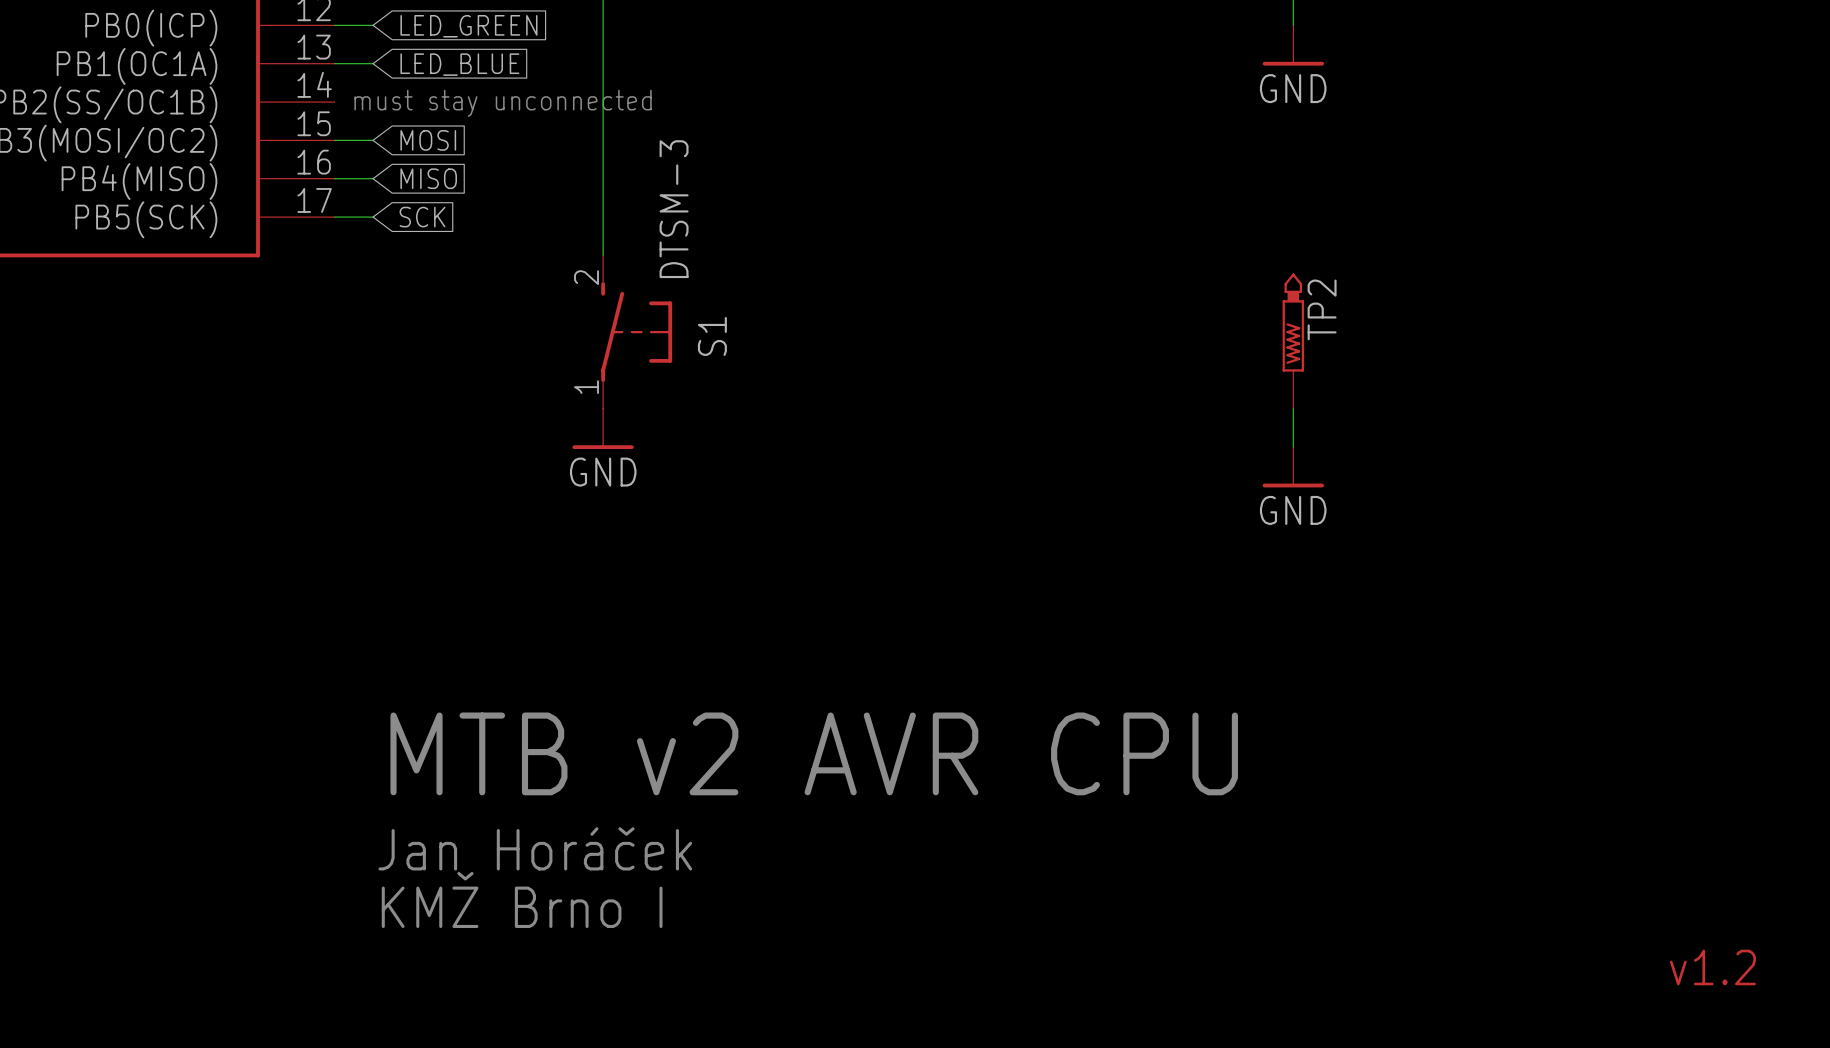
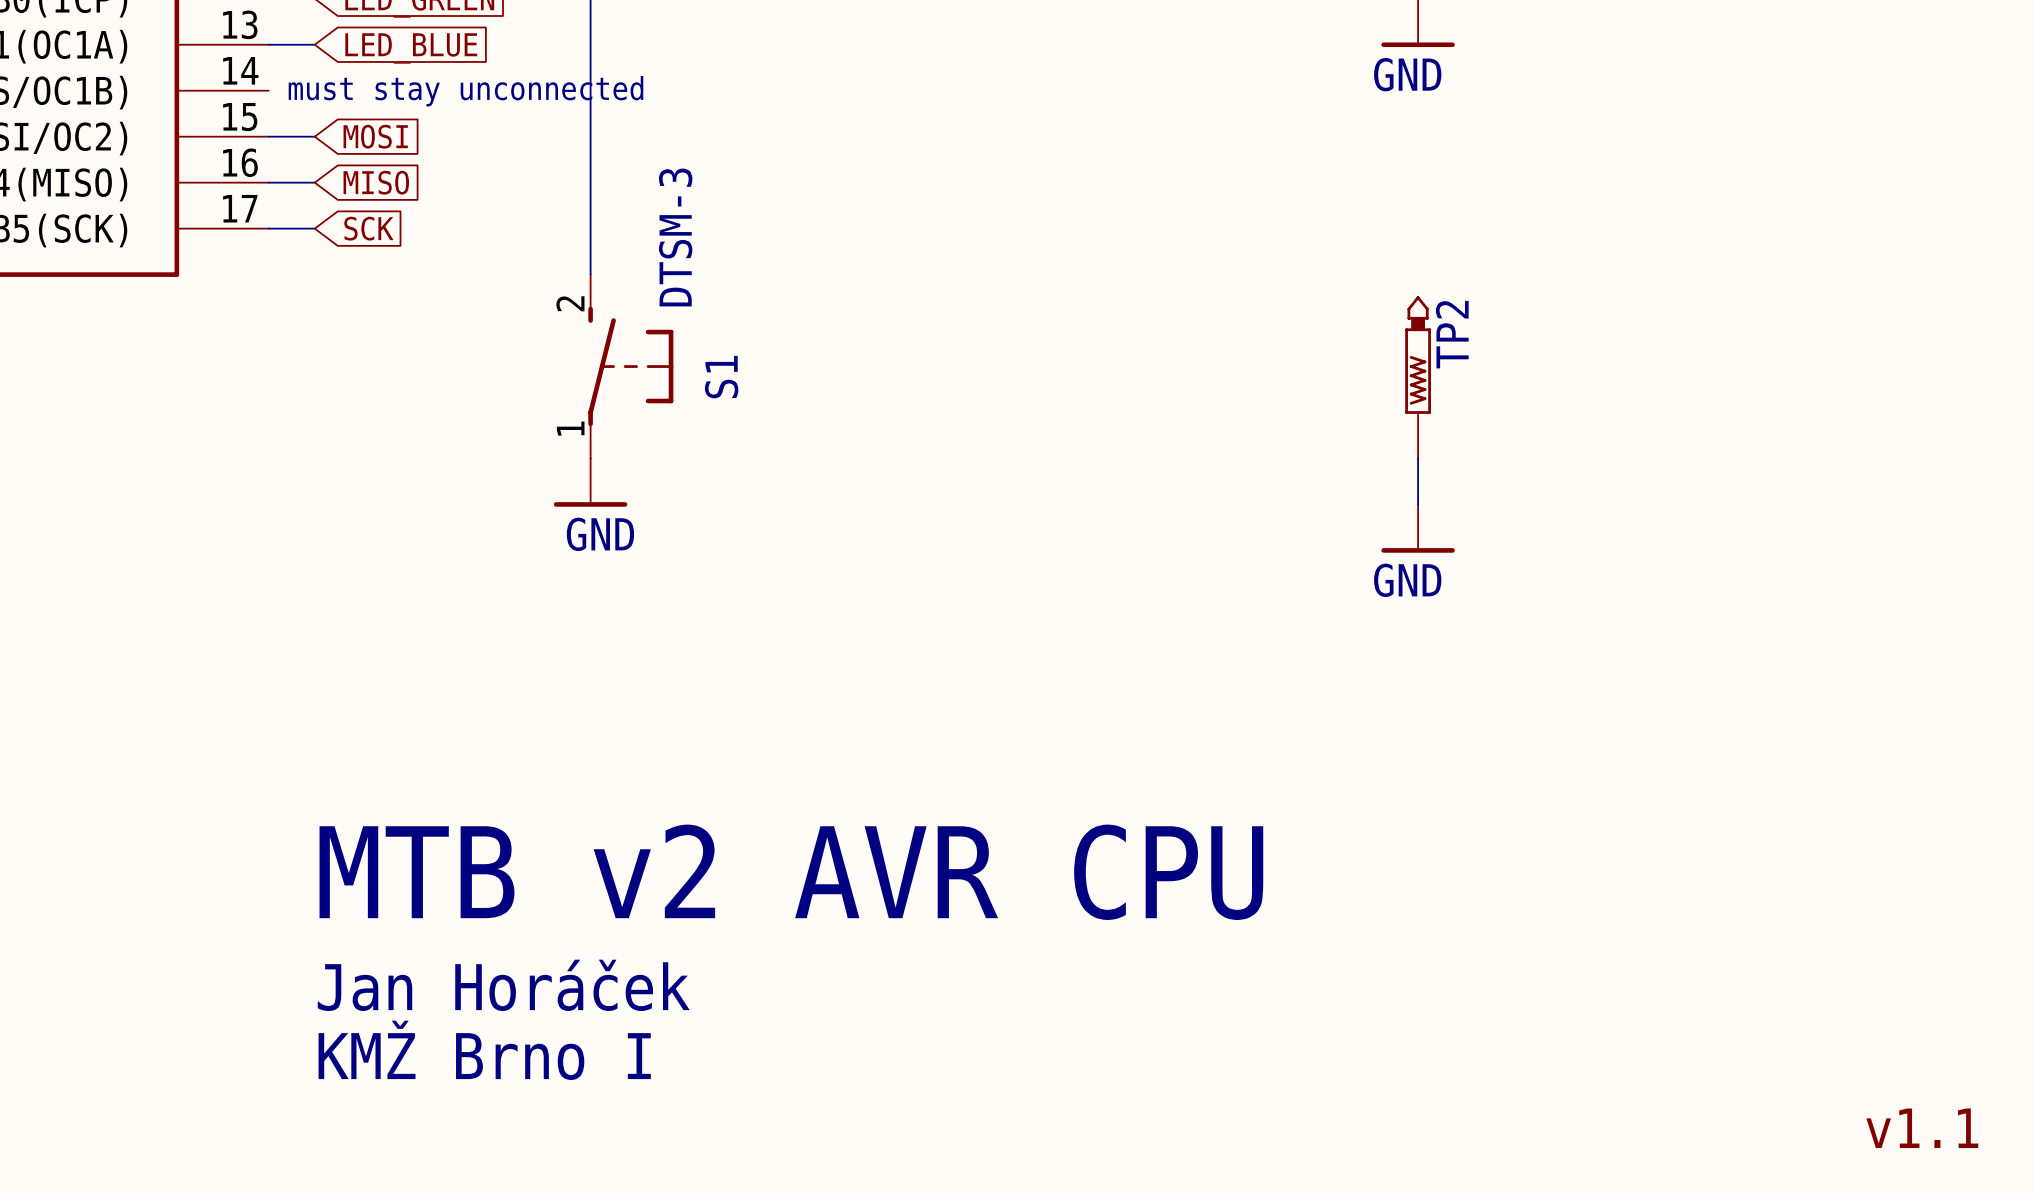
text: v1.2 (1712, 967) -> v1.1 (1922, 1128)

